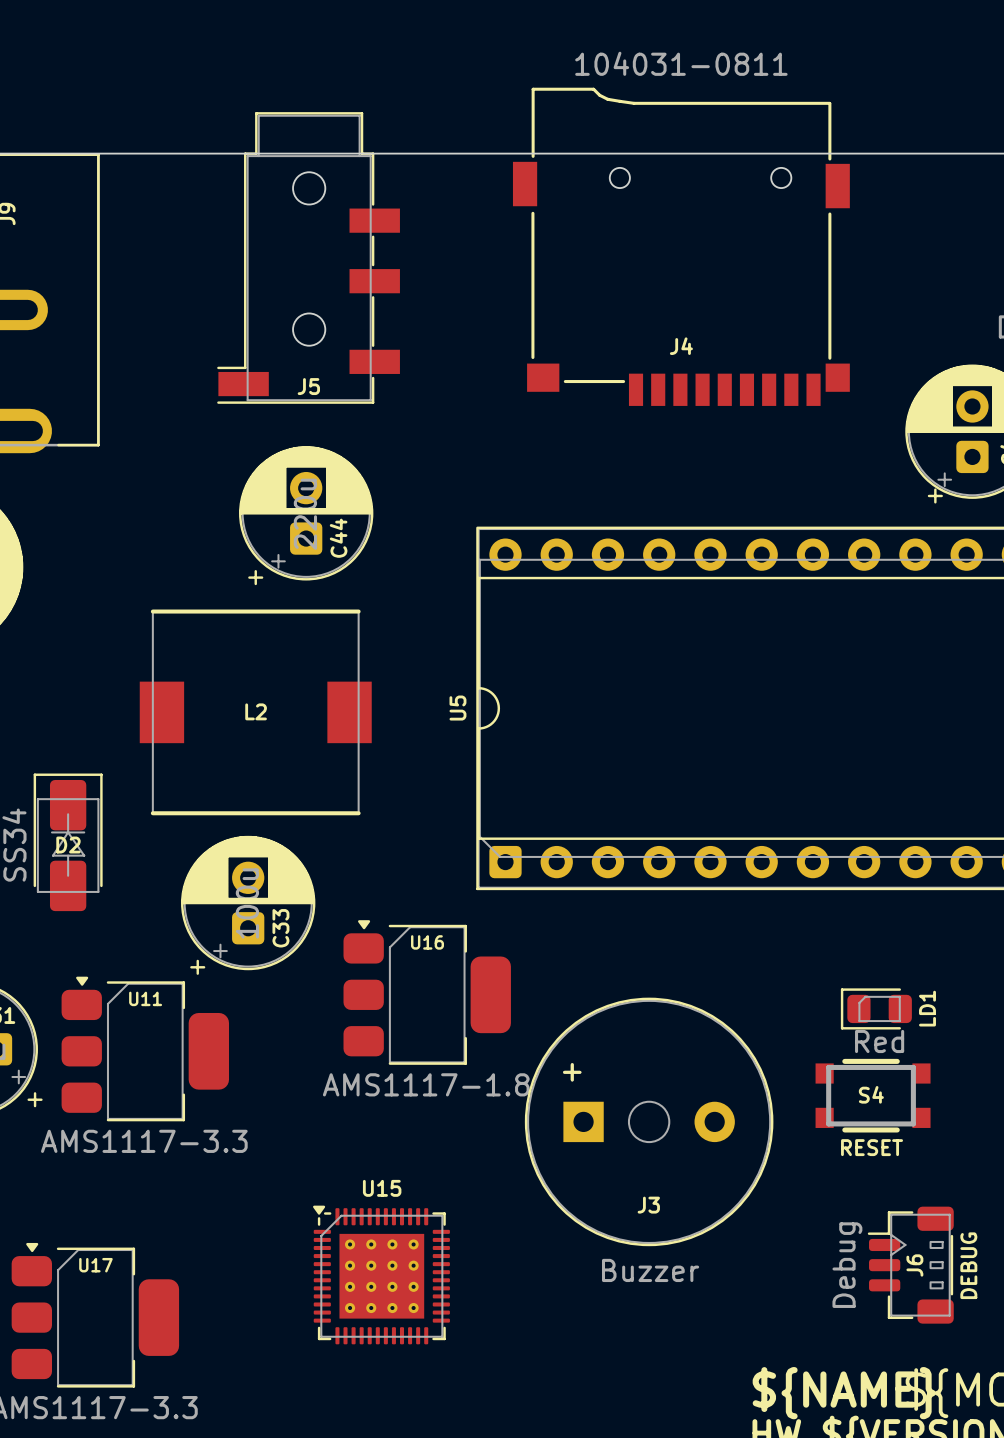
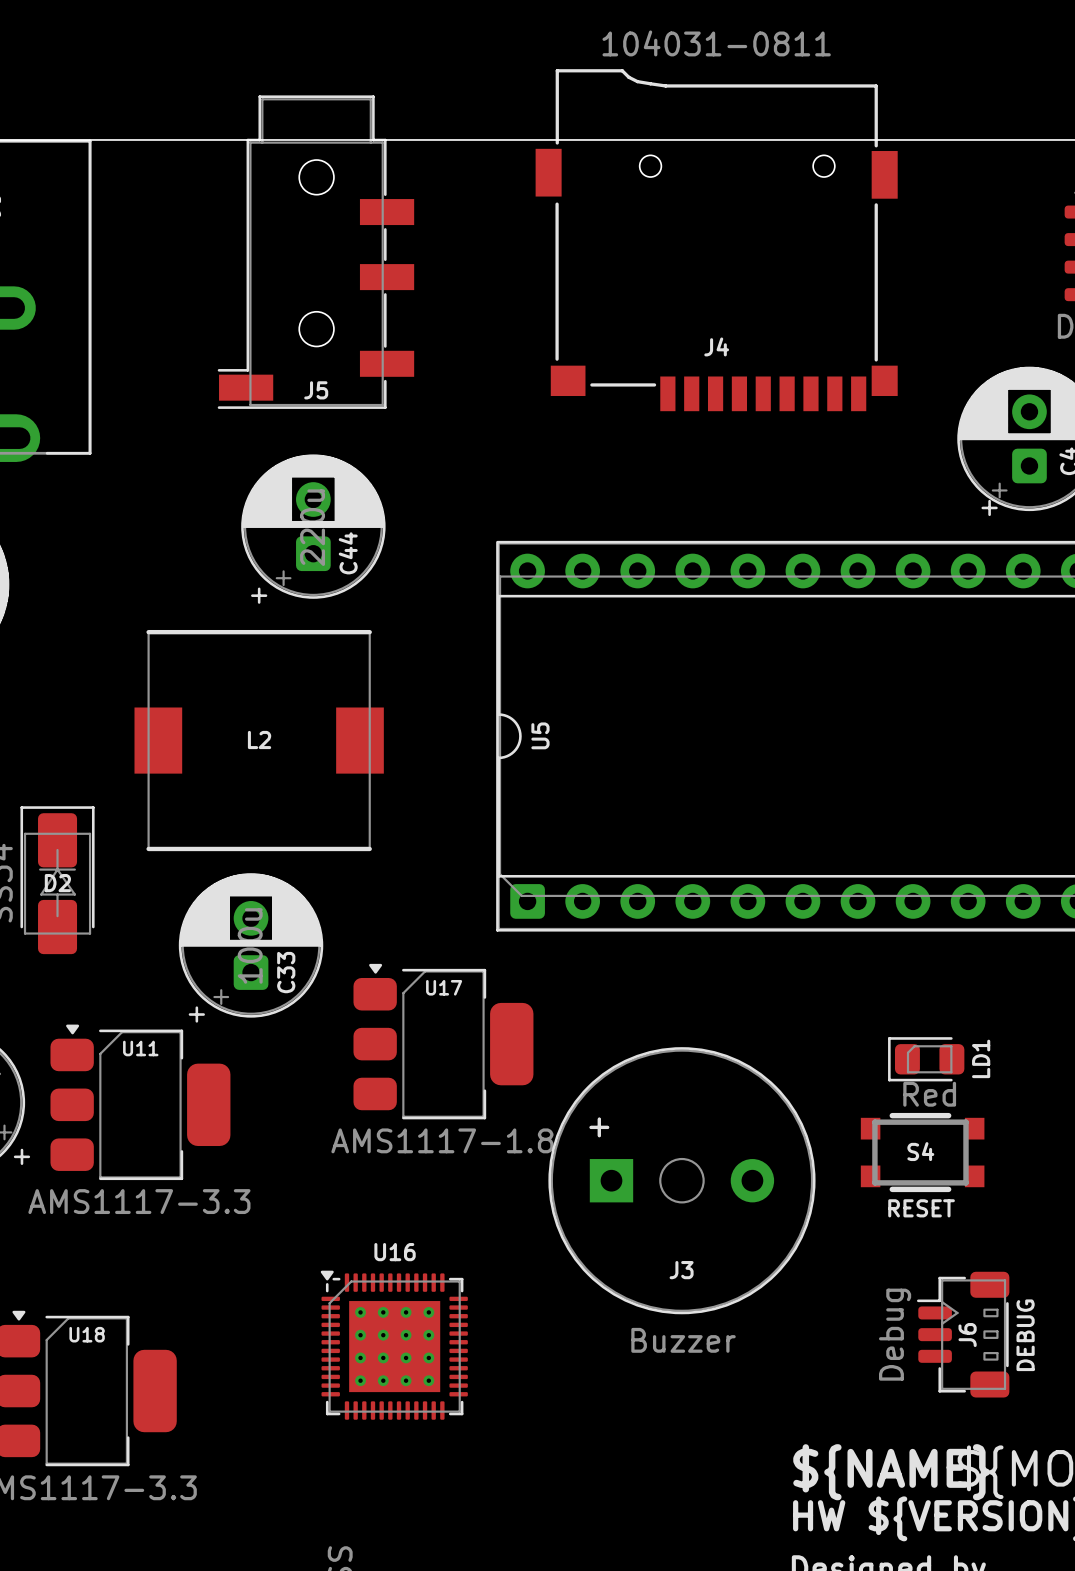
U5 name position: U5 (457, 708) -> U5 (540, 735)
U16 name: U16 (427, 942) -> U17 (444, 987)
U15 name: U15 (382, 1188) -> U16 (395, 1252)
U17 name: U17 (95, 1265) -> U18 (87, 1334)

